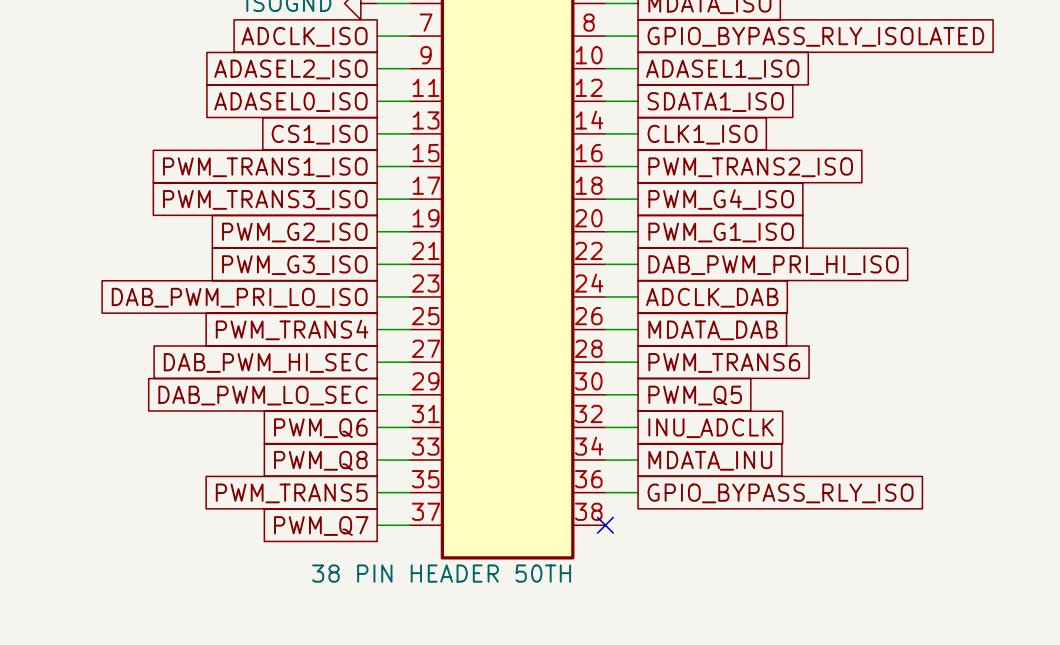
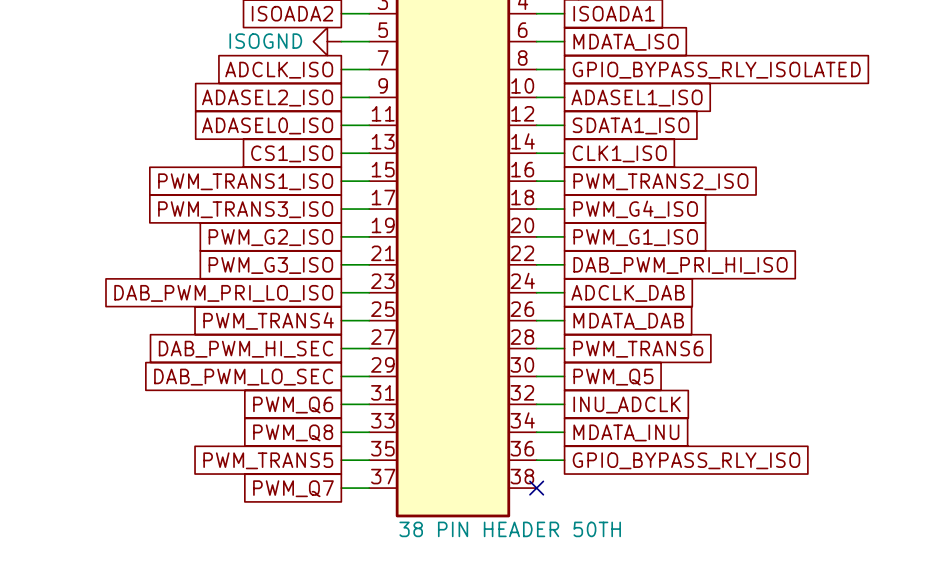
part value position: 38 PIN HEADER 50TH (441, 573) -> 38 PIN HEADER 50TH (510, 529)

